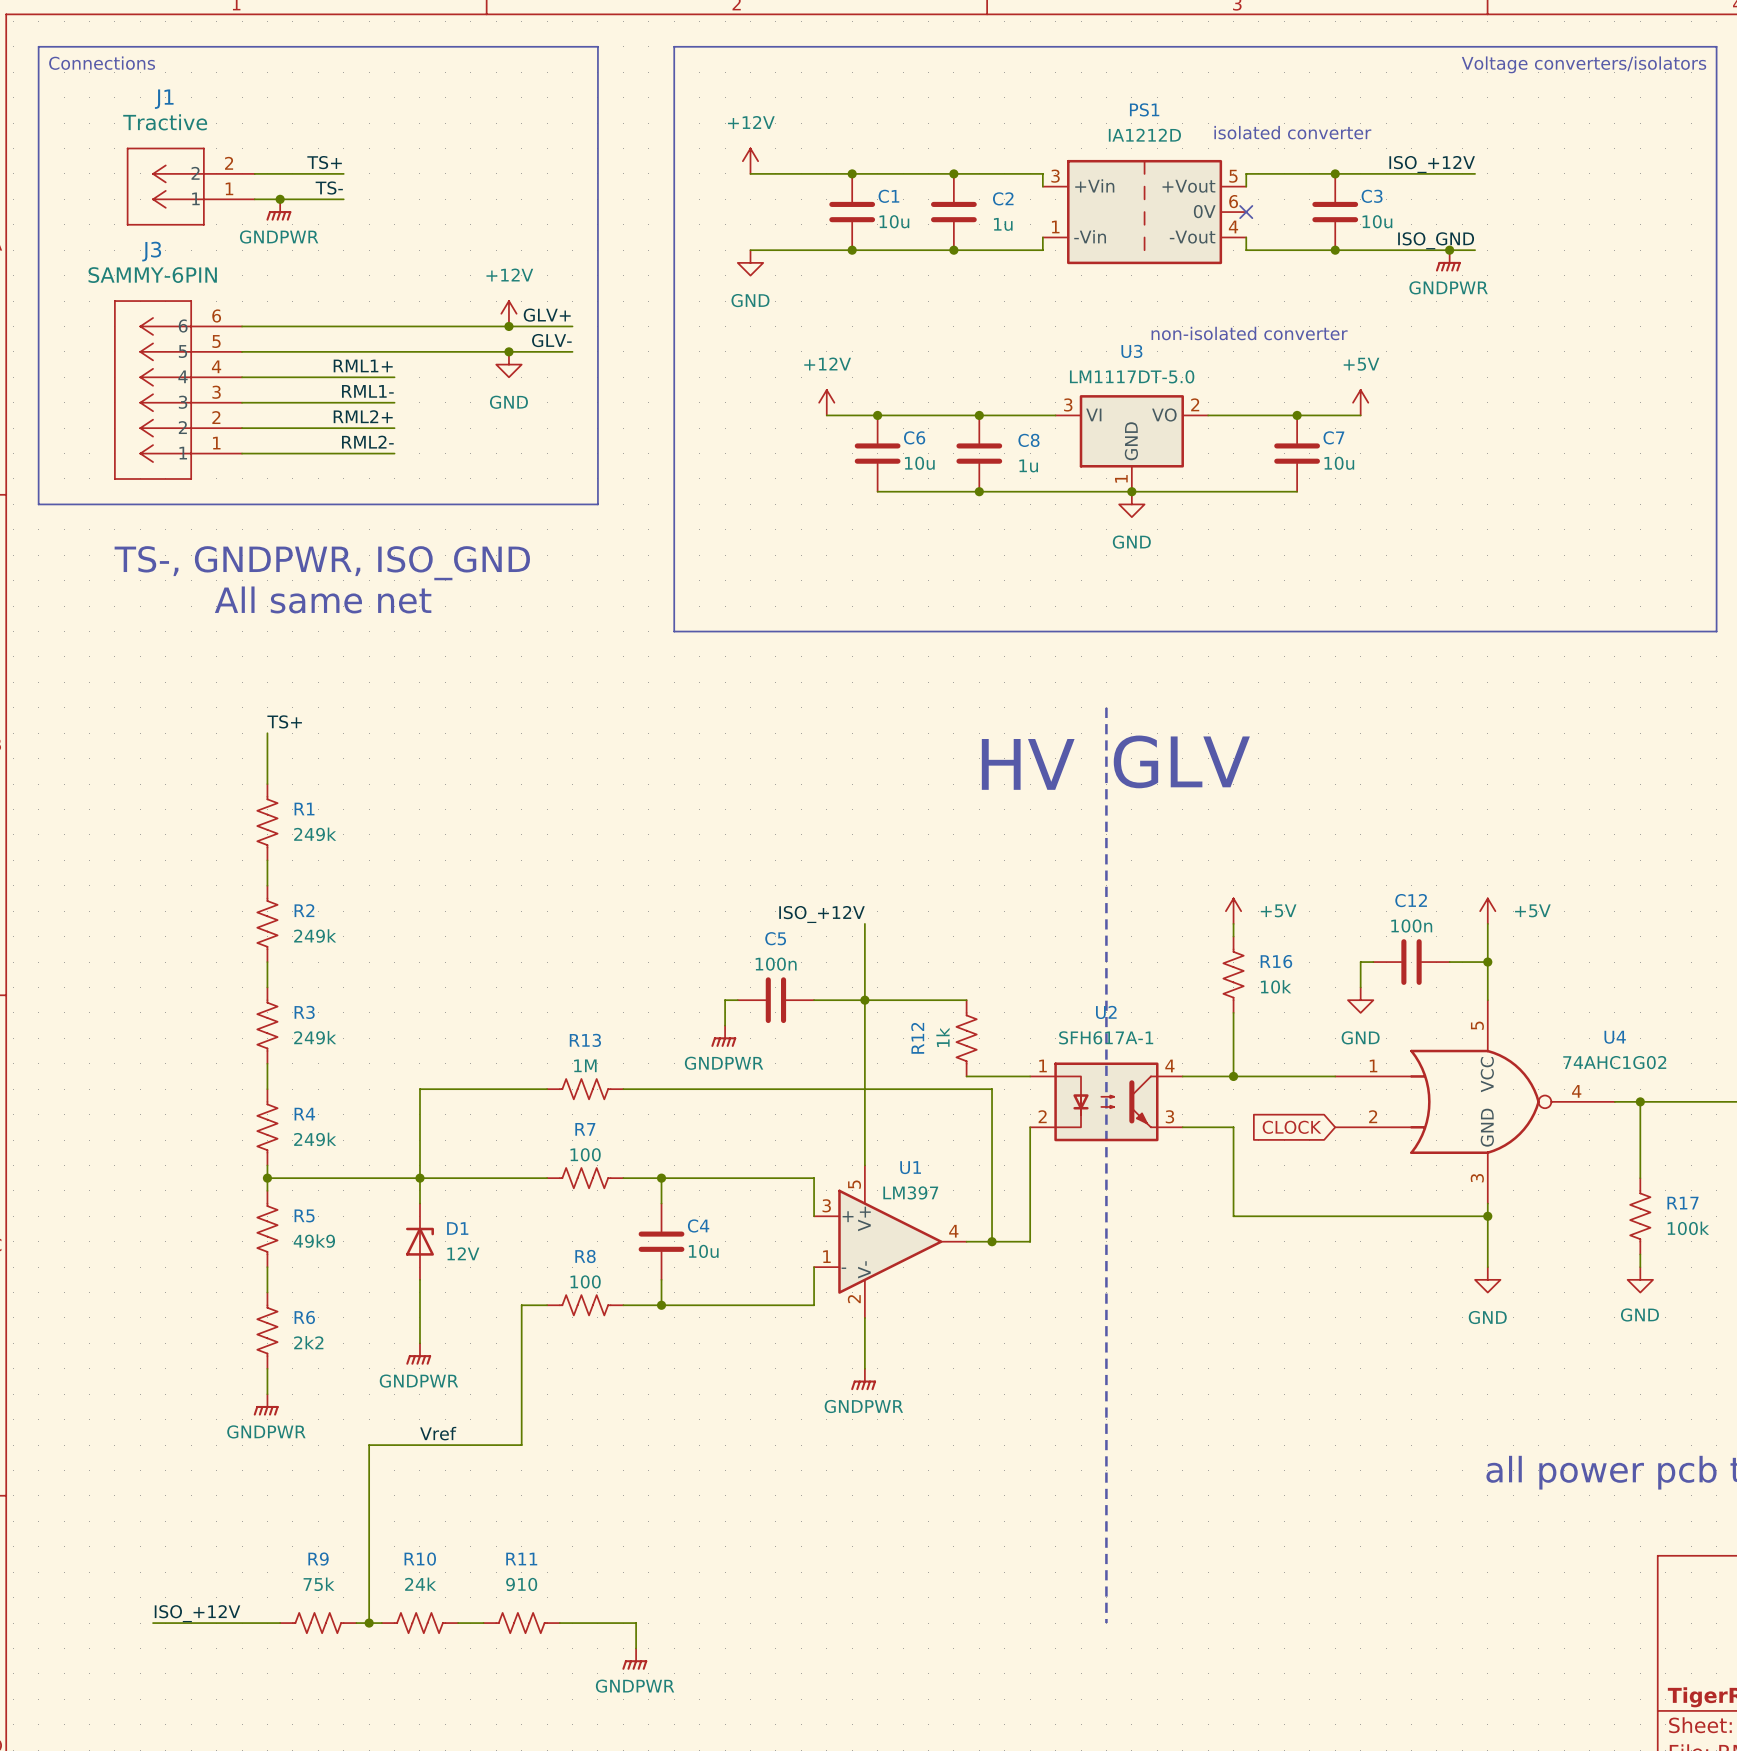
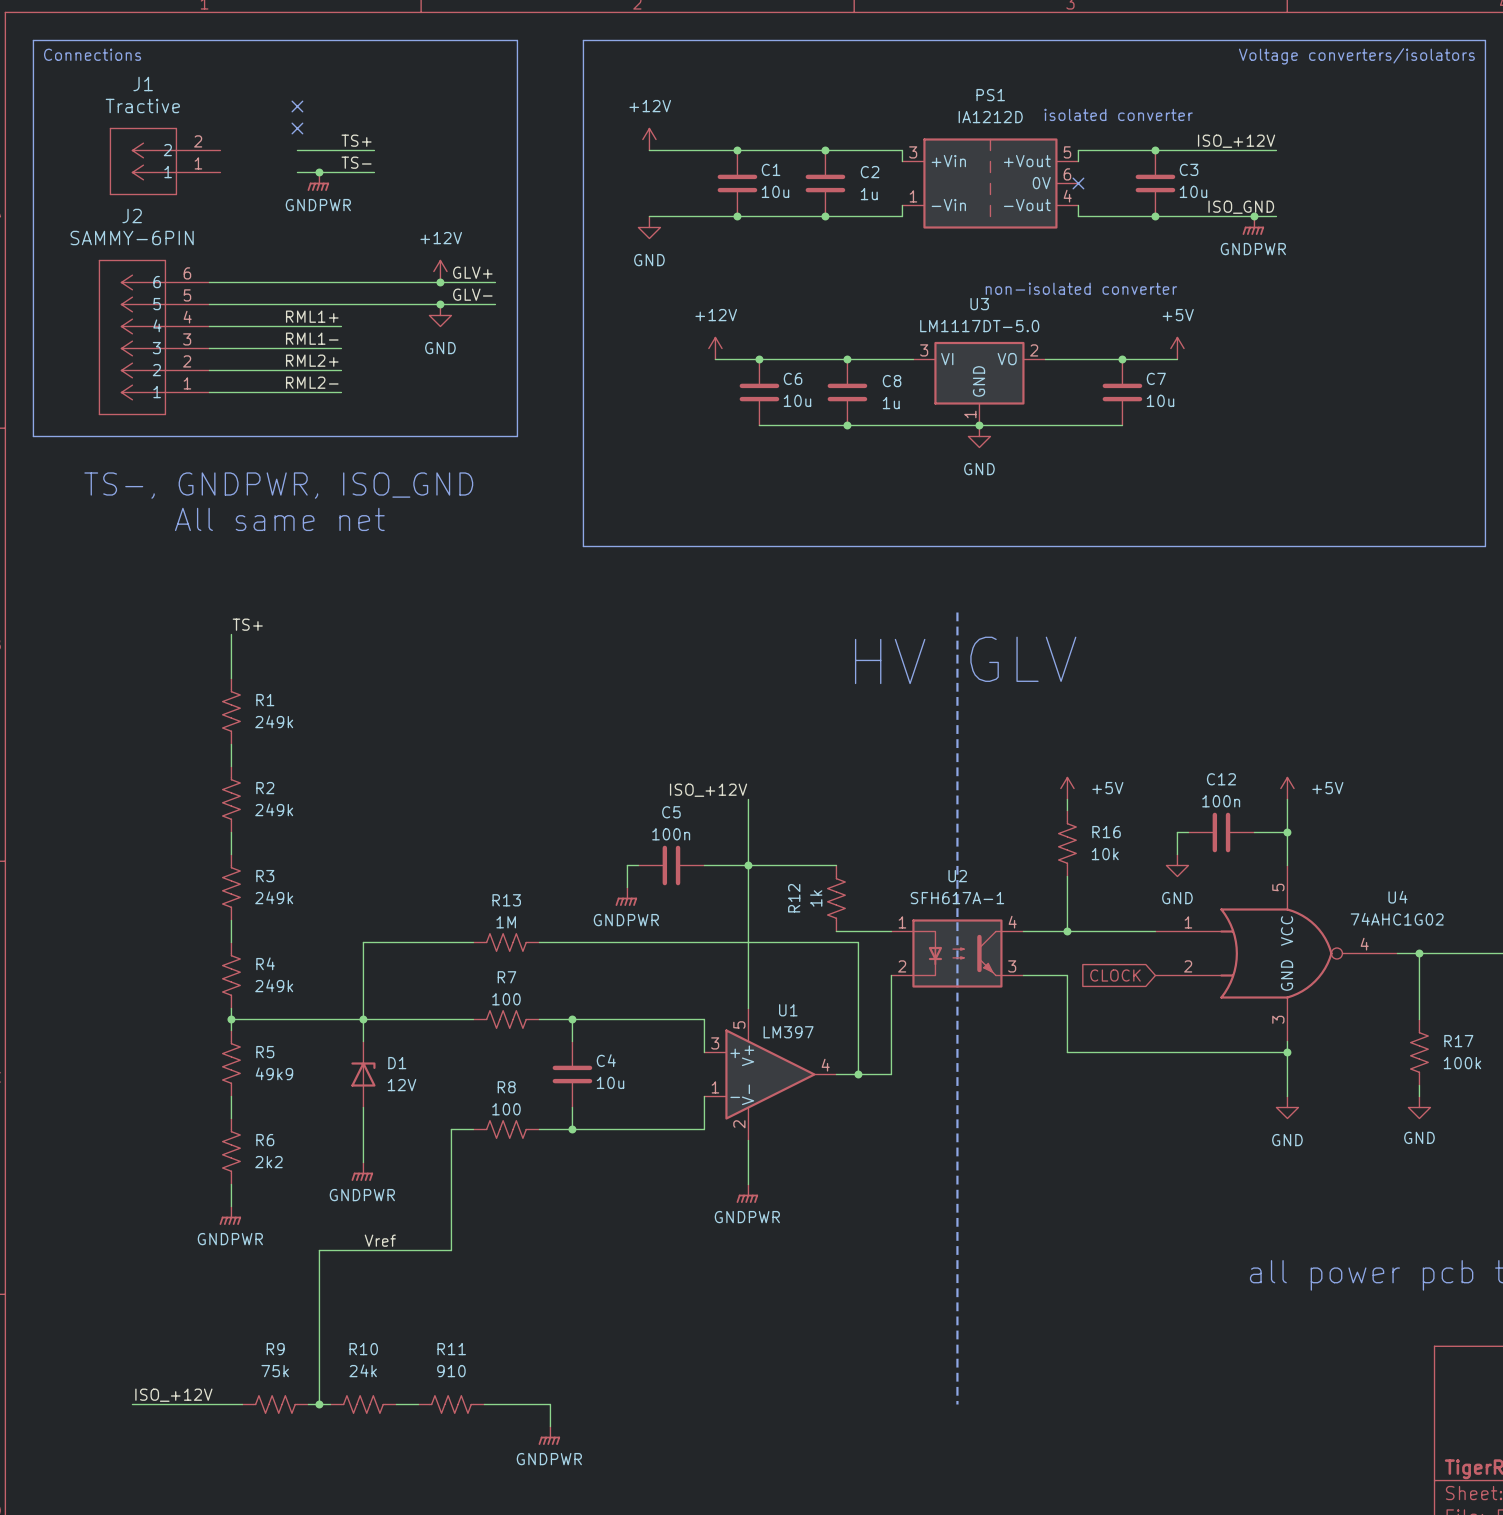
no-connect mark: none -> (297, 106)
no-connect mark: none -> (297, 128)
label position: TS+ (324, 162) -> TS+ (356, 140)
wire: (254, 173) (343, 173) -> (374, 150) (297, 150)
label position: TS- (329, 188) -> TS- (356, 162)
wire: (254, 199) (343, 199) -> (374, 172) (297, 172)
junction: (280, 199) -> none
junction: none -> (319, 172)
power symbol position: GNDPWR (278, 210) -> GNDPWR (318, 181)
J3 name: J3 (151, 251) -> J2 (132, 216)

